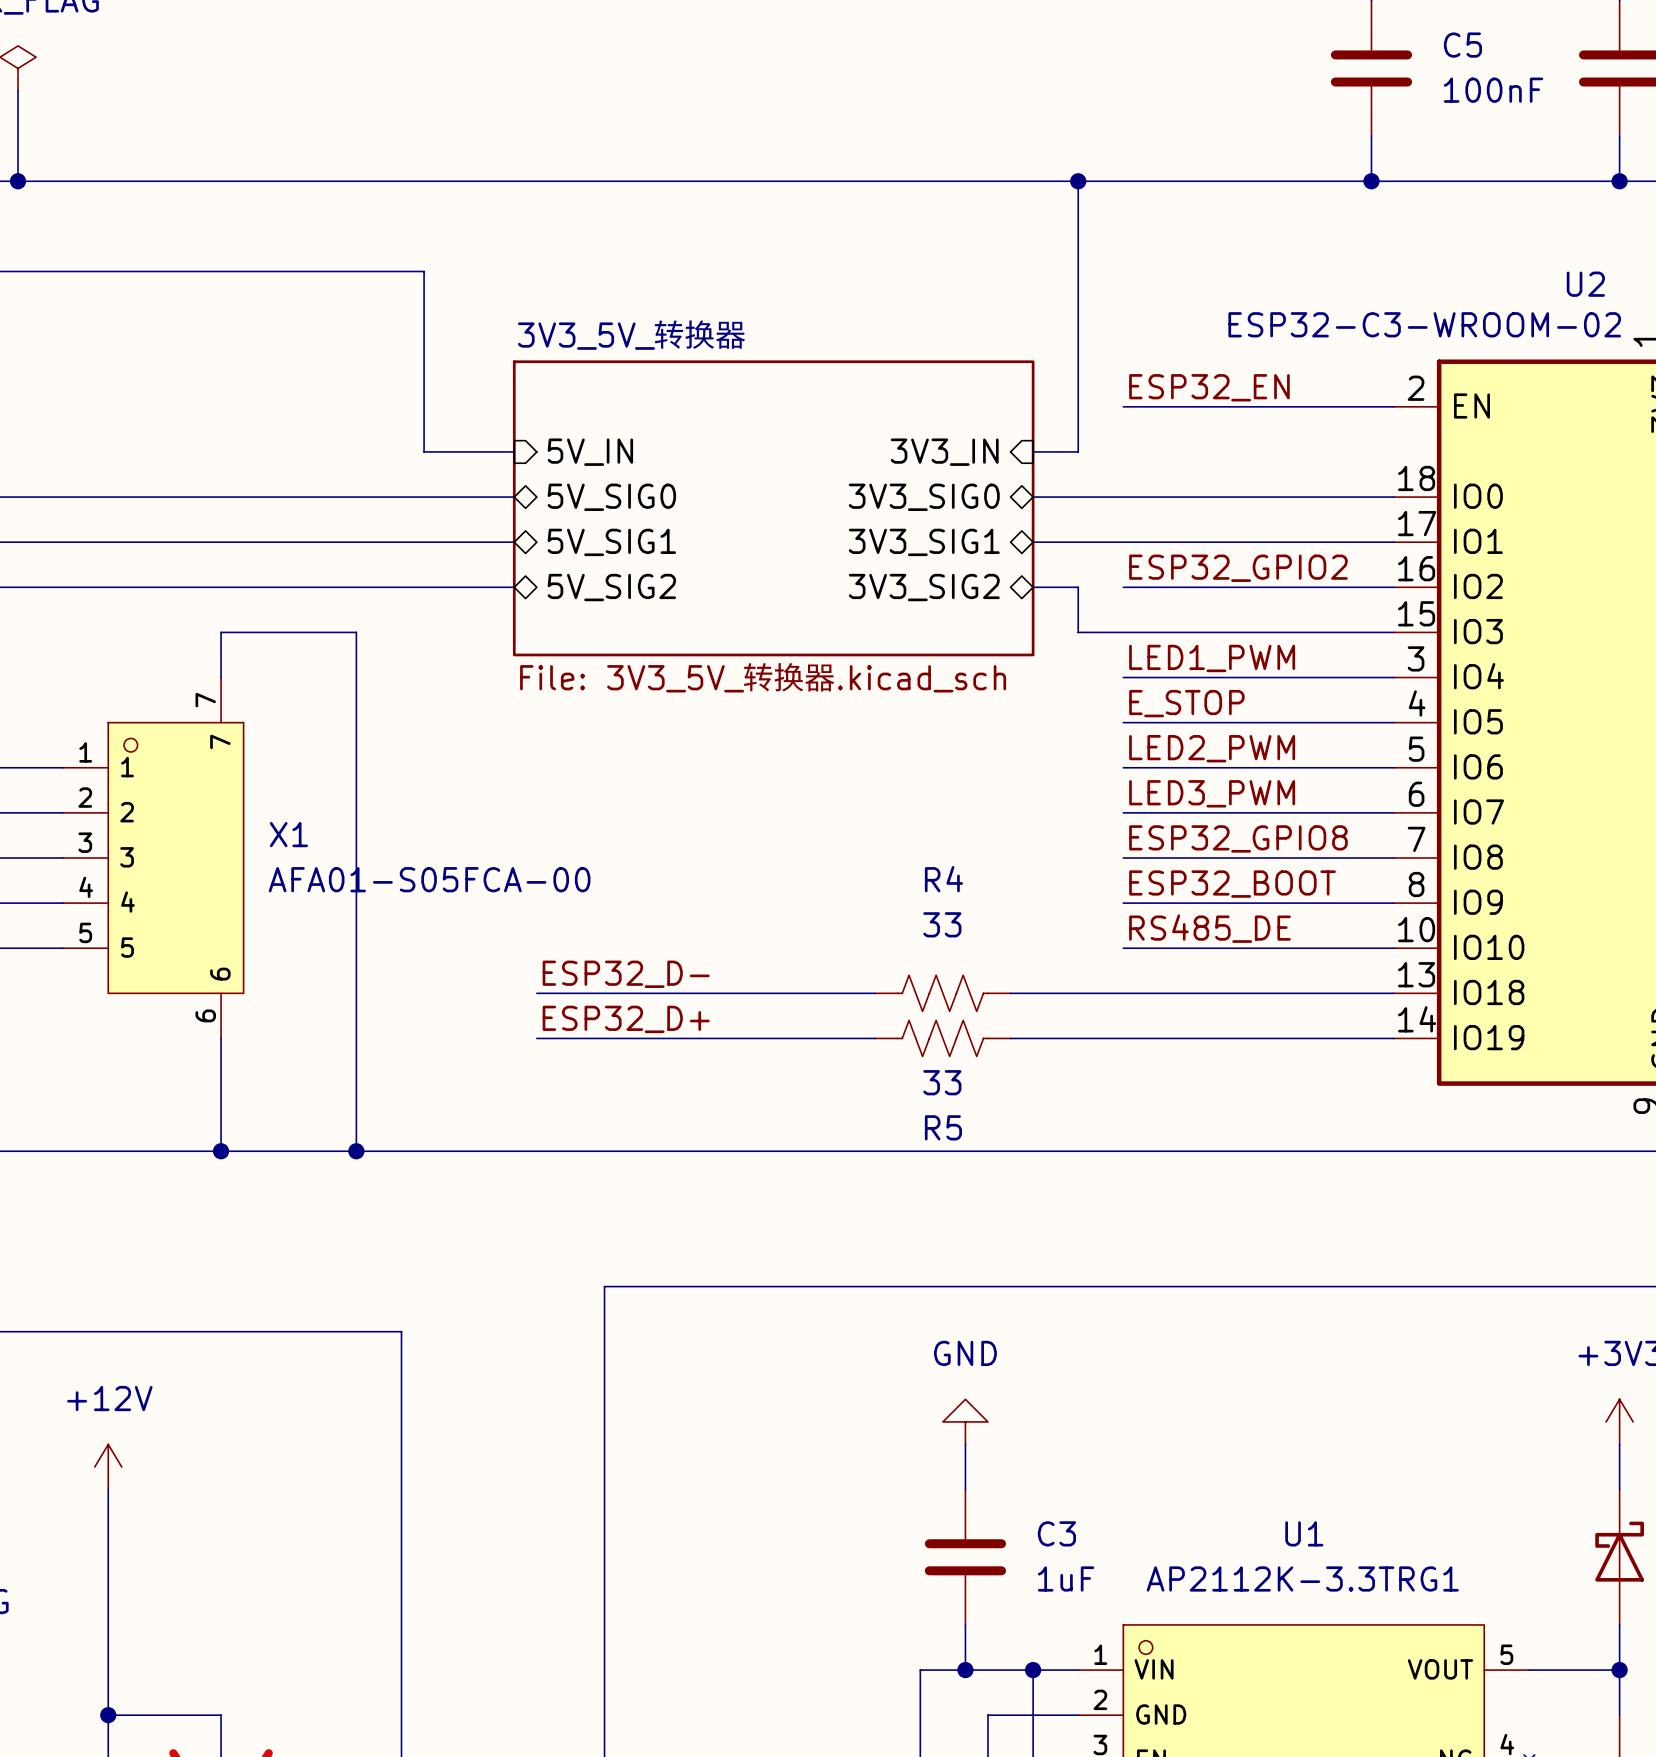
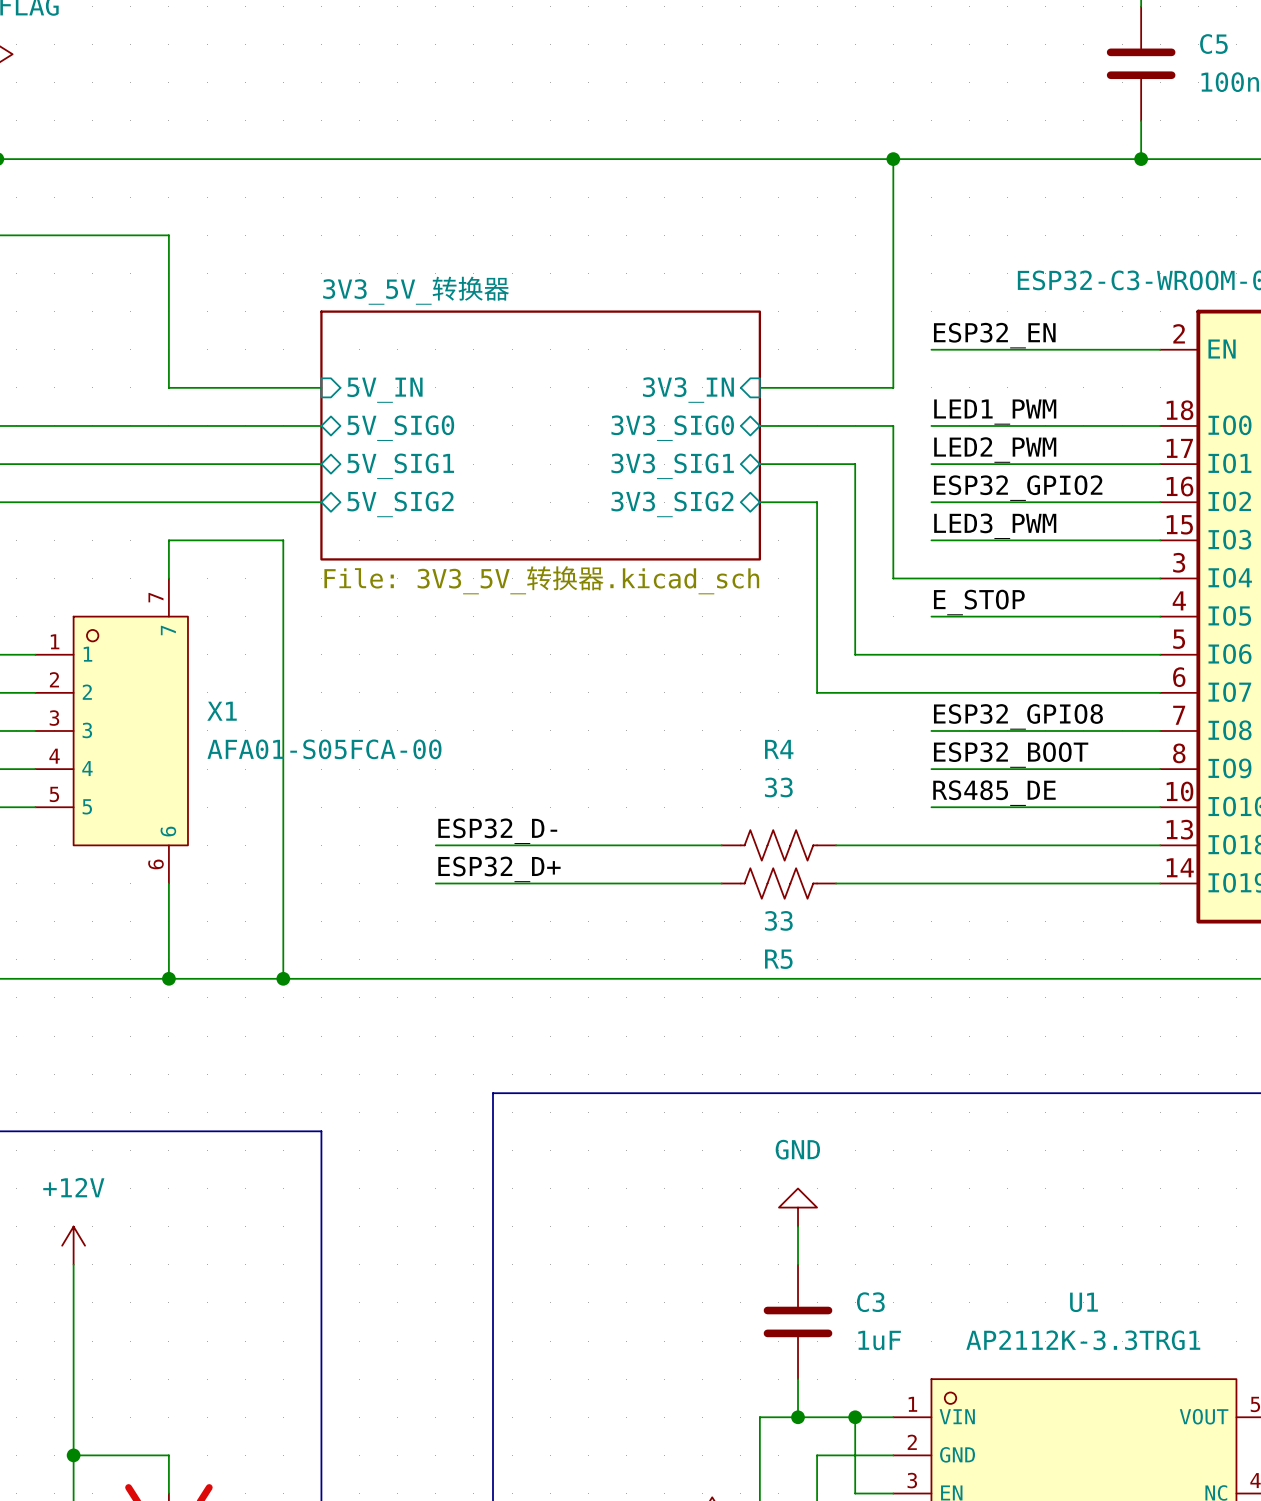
wire: (221, 271) (424, 271) (424, 451) (514, 451) -> (168, 235) (168, 387) (321, 387)
wire: none -> (759, 387) (855, 387)
sheet pin position: 5V_IN (590, 452) -> 5V_IN (385, 390)
sheet pin position: 3V3_IN (944, 452) -> 3V3_IN (688, 390)
wire: (401, 497) (514, 497) -> none
sheet pin position: 5V_SIG0 (611, 497) -> 5V_SIG0 (400, 428)
wire: none -> (759, 425) (855, 425)
sheet pin position: 3V3_SIG0 (924, 497) -> 3V3_SIG0 (672, 428)
wire: (1078, 497) (1123, 497) -> (893, 425) (893, 502)
sheet 3V3_5V_转换器 position: (773, 508) -> (540, 435)
wire: (401, 542) (514, 542) -> none
sheet pin position: 5V_SIG1 (611, 542) -> 5V_SIG1 (400, 466)
wire: none -> (759, 464) (855, 464) (855, 654) (931, 654)
sheet pin position: 3V3_SIG1 (924, 542) -> 3V3_SIG1 (672, 466)
wire: (1033, 542) (1123, 542) -> none
wire: (401, 587) (514, 587) -> none
sheet pin position: 5V_SIG2 (611, 587) -> 5V_SIG2 (400, 504)
wire: none -> (759, 502) (817, 502) (817, 692) (931, 692)
sheet pin position: 3V3_SIG2 (924, 587) -> 3V3_SIG2 (672, 504)
wire: (1033, 587) (1078, 587) -> none
wire: (1078, 632) (1123, 632) -> (893, 540) (893, 578) (931, 578)
label position: LED1_PWM (1212, 658) -> LED1_PWM (995, 412)
label position: LED2_PWM (1212, 748) -> LED2_PWM (995, 450)
label position: LED3_PWM (1212, 793) -> LED3_PWM (995, 526)

